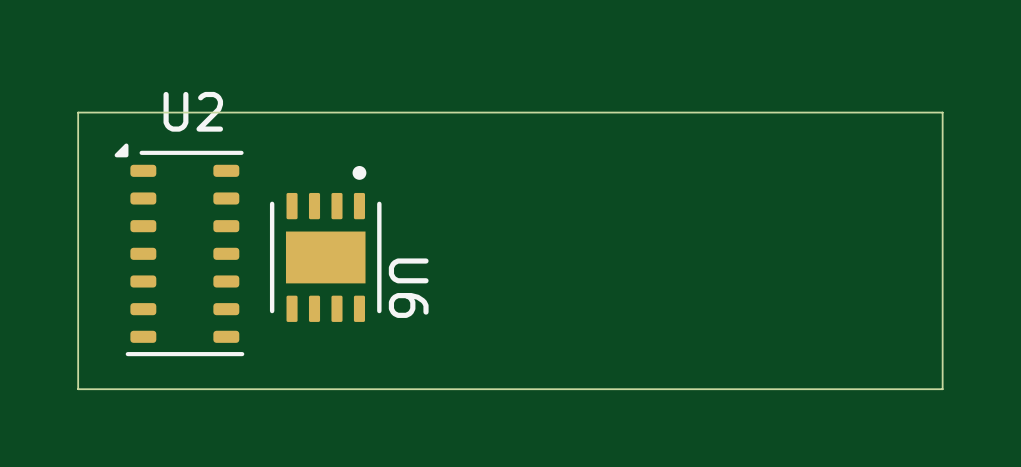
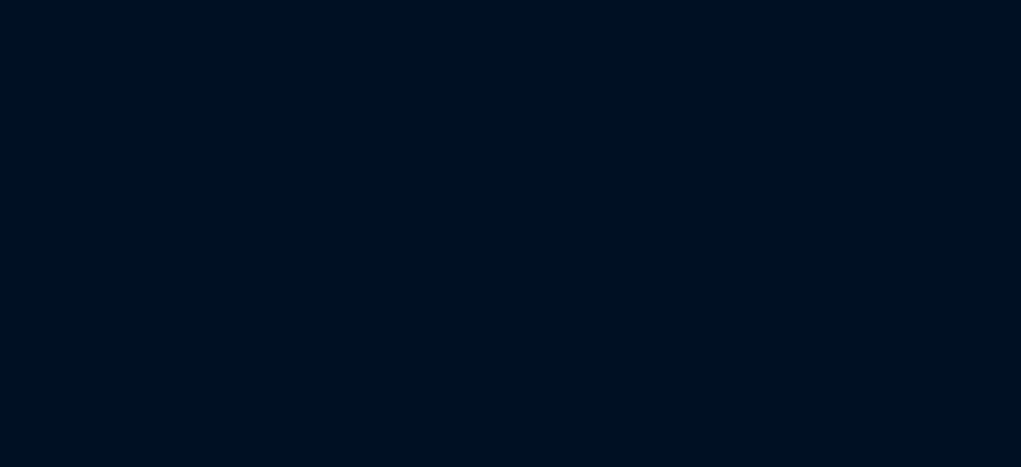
board edge: (942, 112) (78, 112) (78, 389) (942, 389) (942, 112) -> none
U6: (325, 243) -> none
U2: (179, 249) -> none

